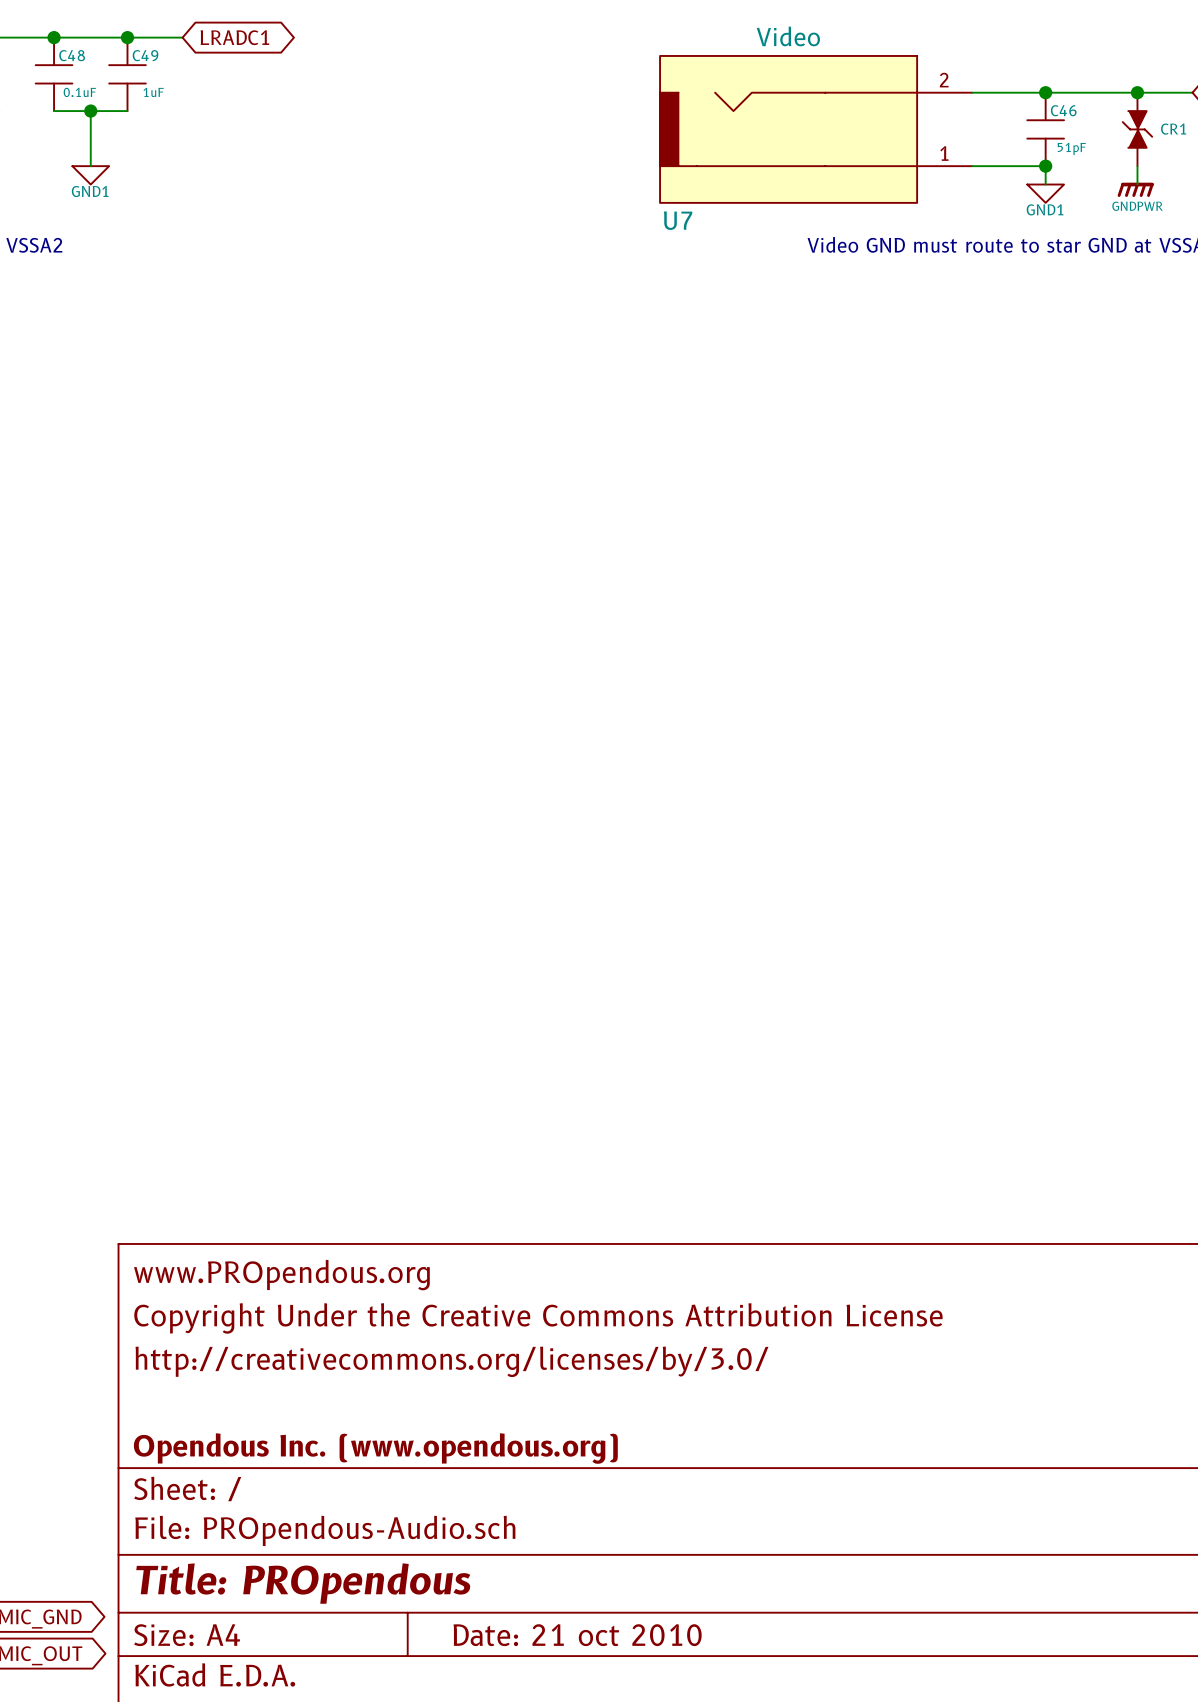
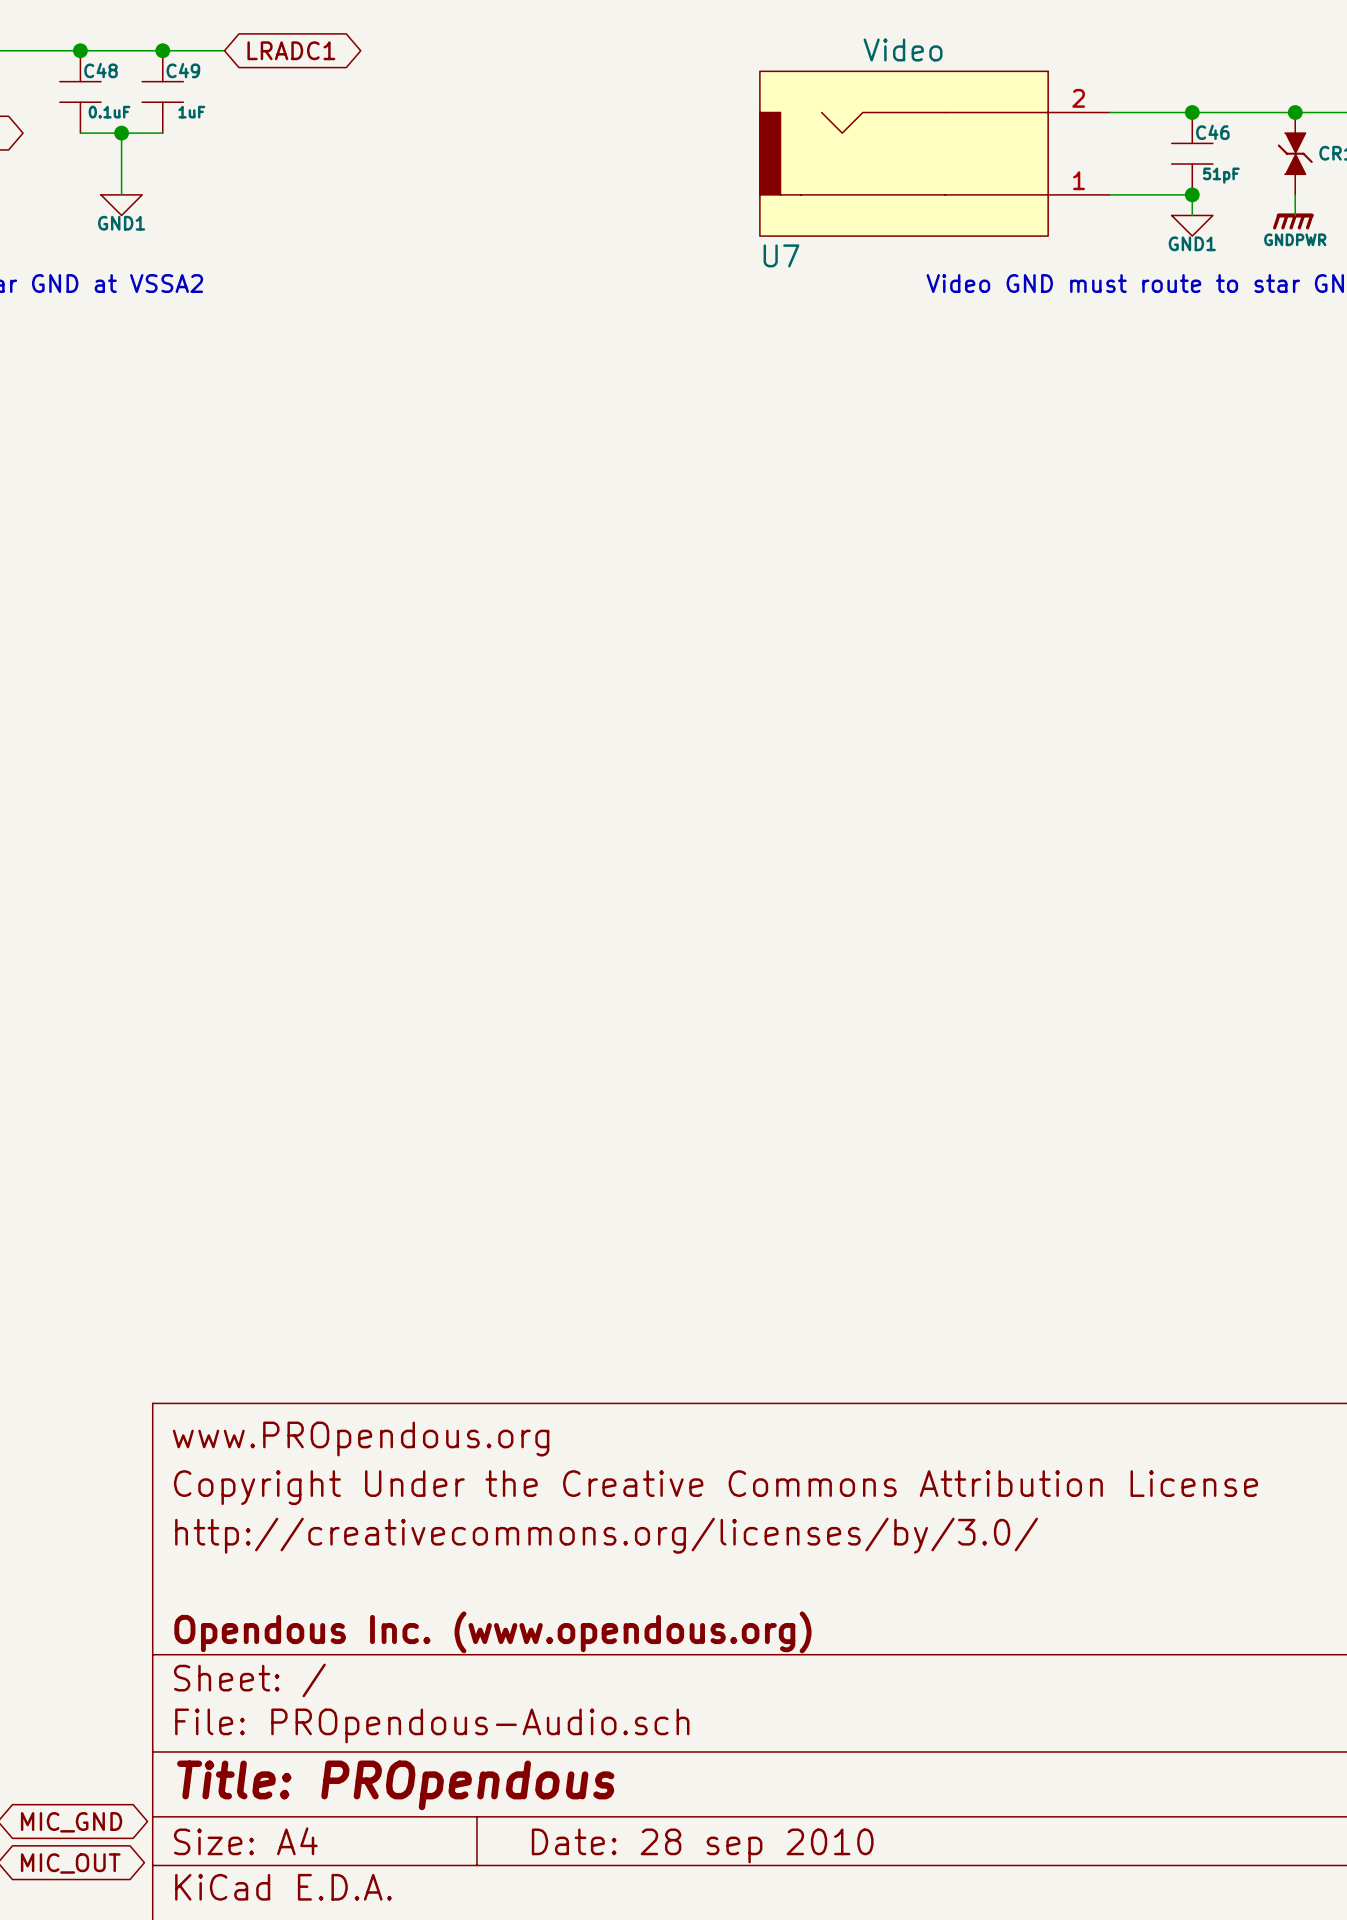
title block: Date: 21 oct 2010 (577, 1635) -> Date: 28 sep 2010 (702, 1845)

